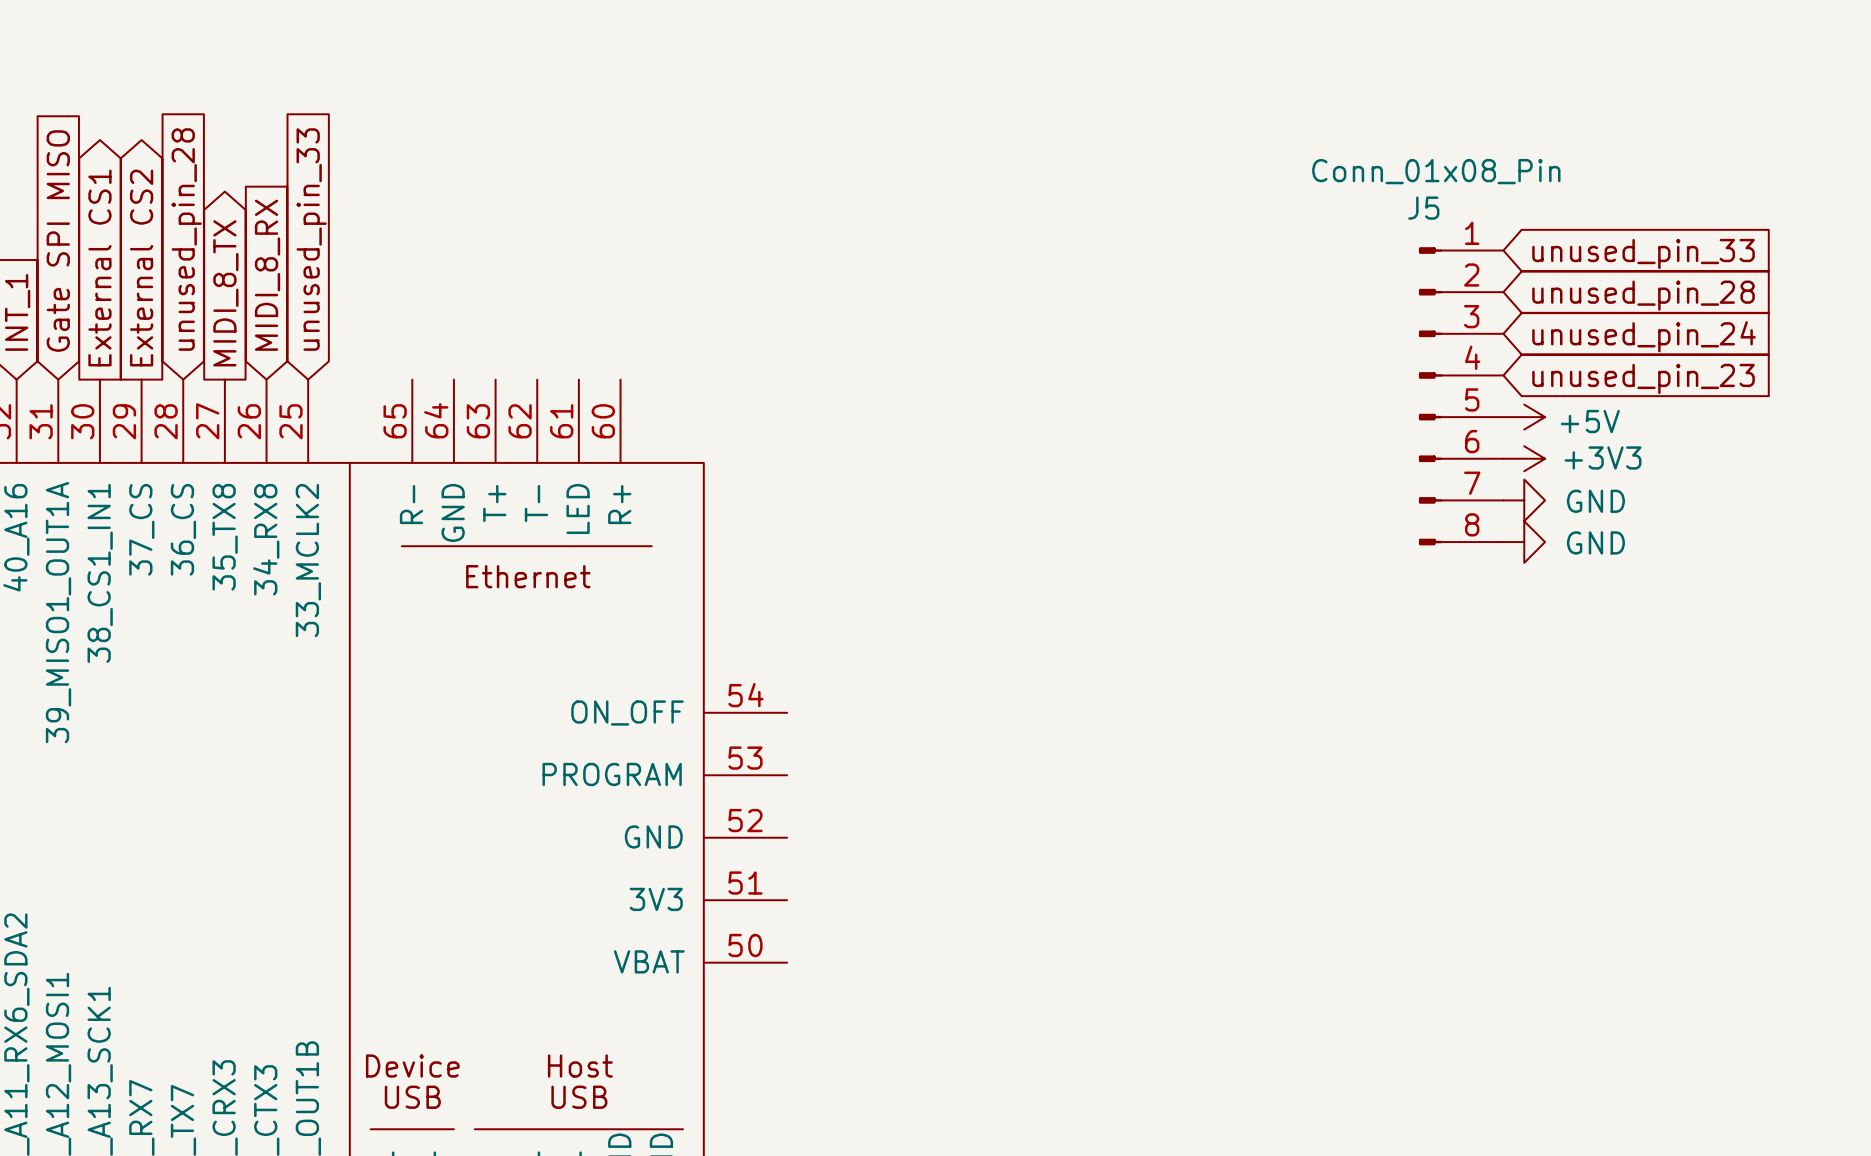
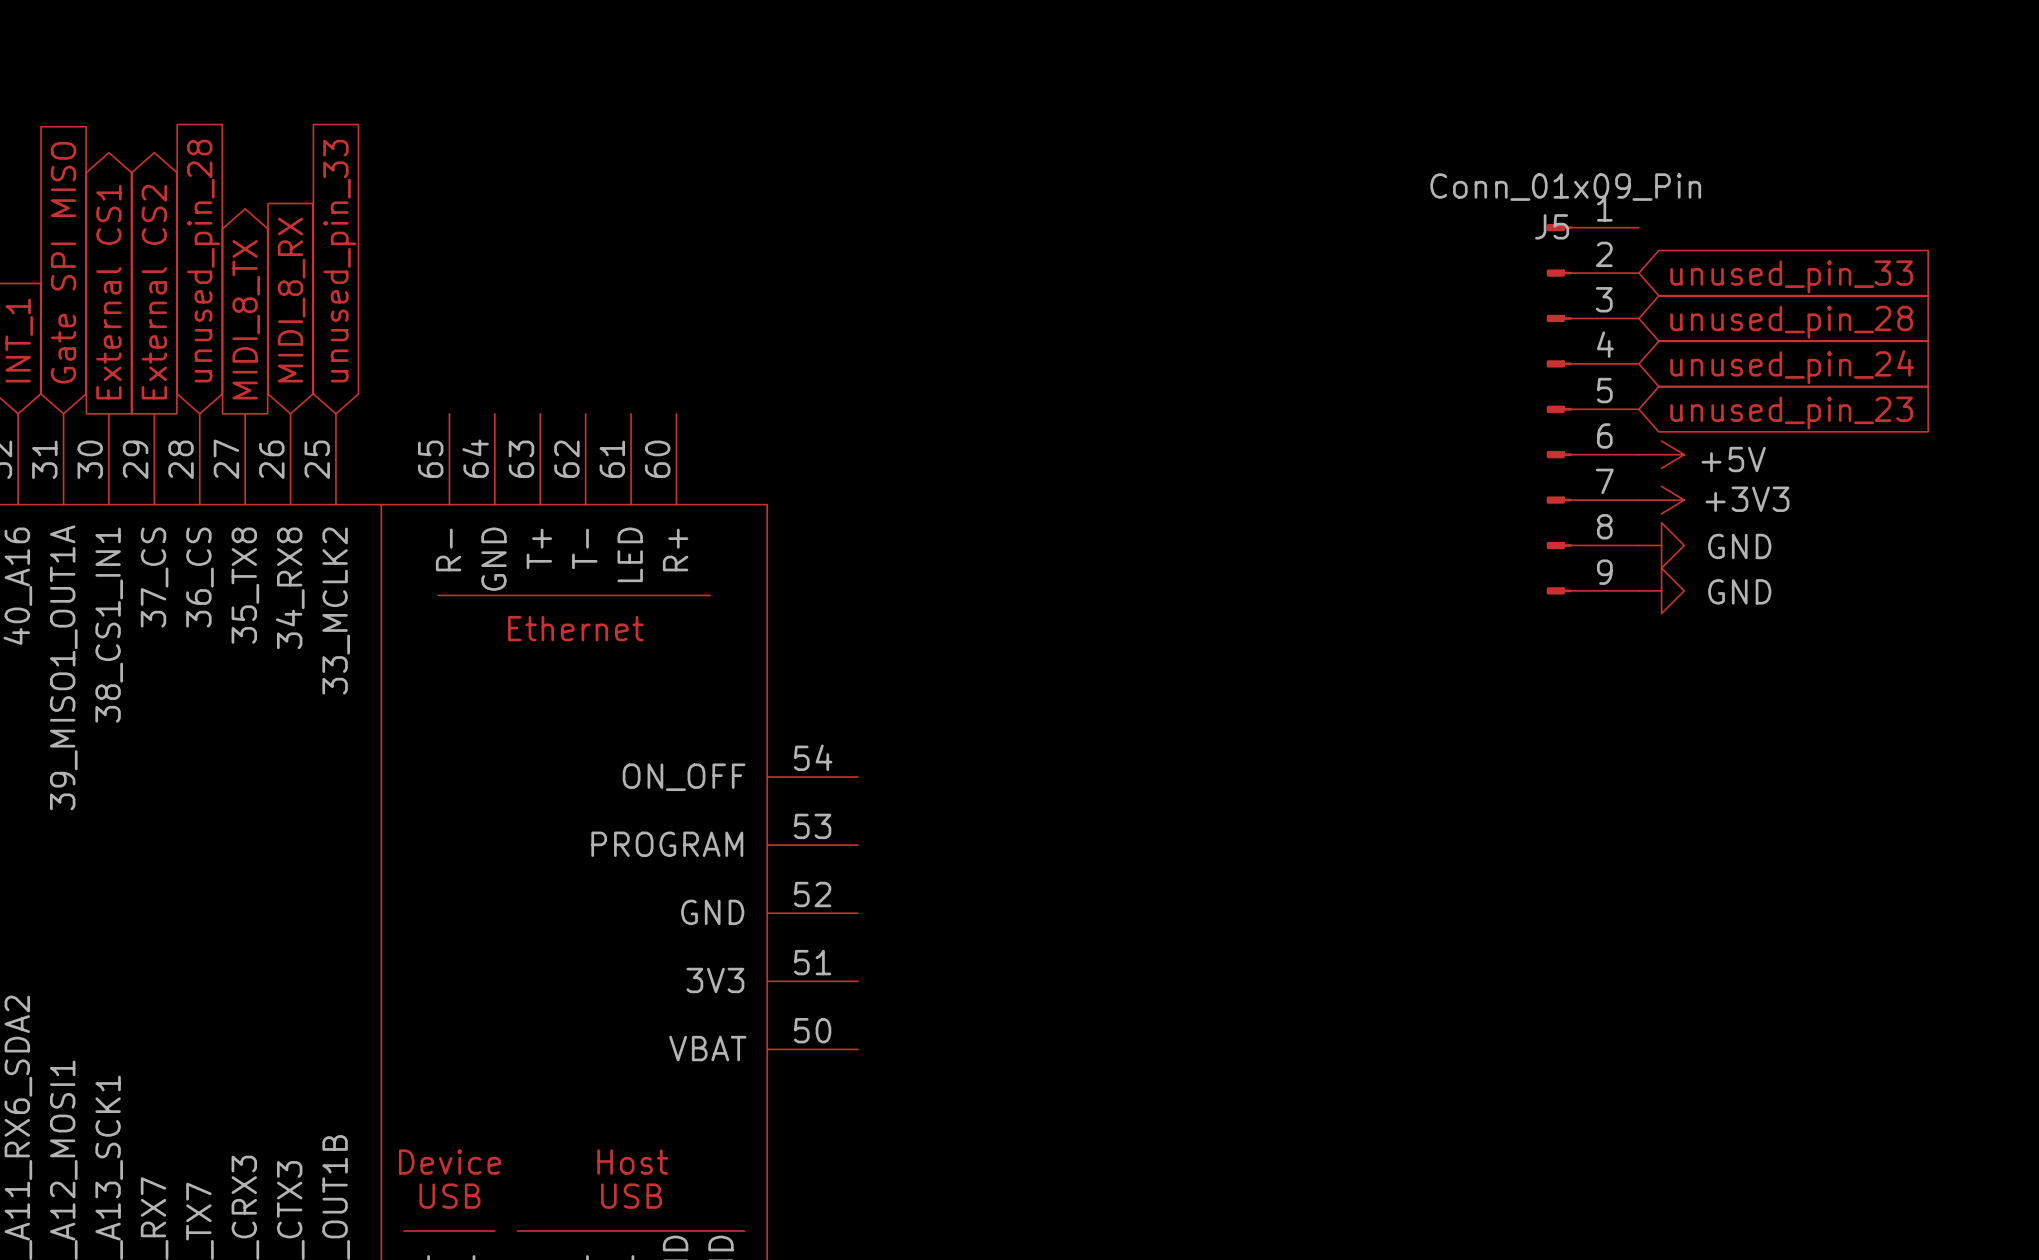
J5 value: Conn_01x08_Pin (1436, 171) -> Conn_01x09_Pin (1565, 187)
J5 symbol: [1418, 247, 1504, 546] -> [1546, 224, 1639, 595]

